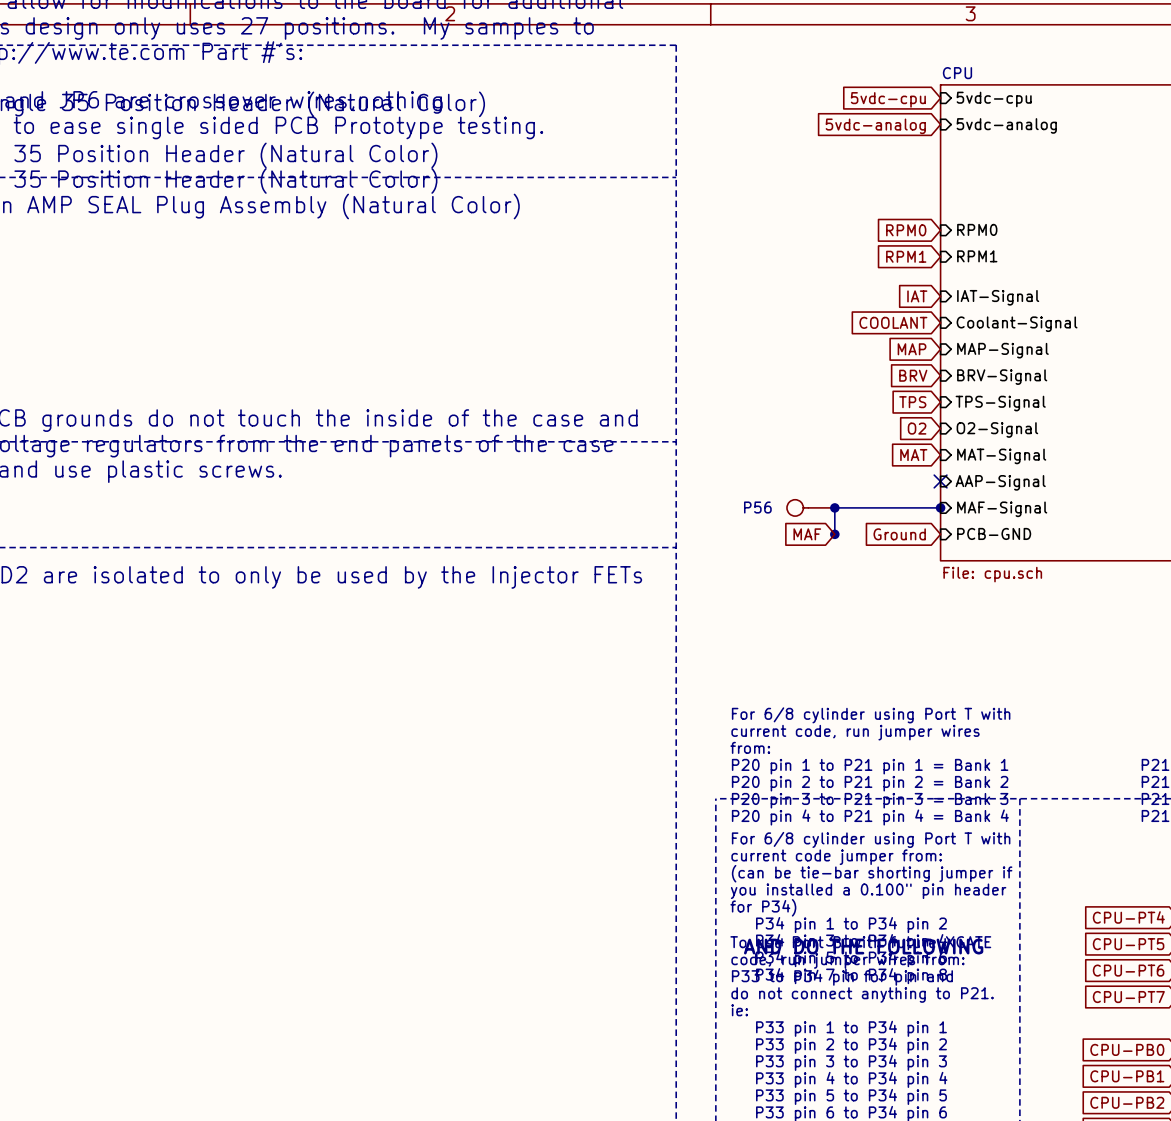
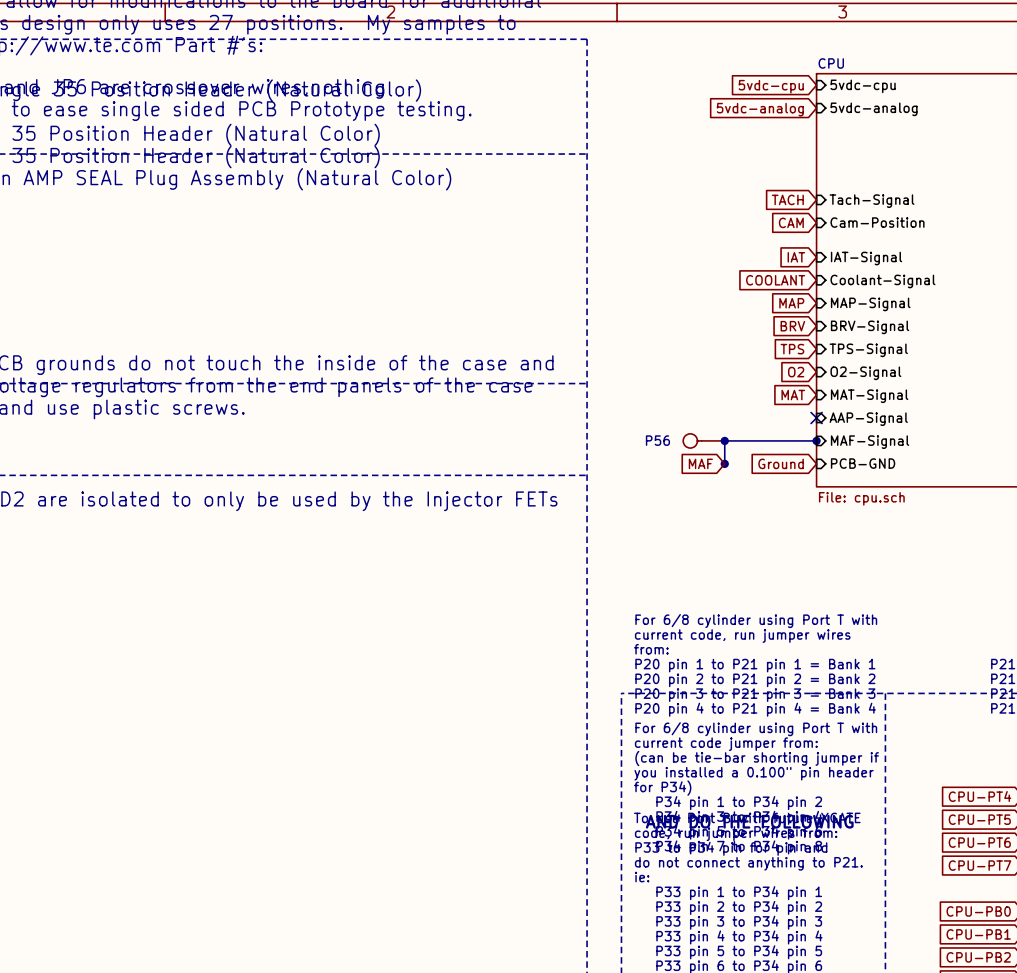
sheet pin: RPM0 (977, 229) -> Tach-Signal (872, 201)
global label: RPM0 (906, 230) -> TACH (787, 199)
global label: RPM1 (906, 256) -> CAM (791, 222)
sheet pin: RPM1 (977, 256) -> Cam-Position (877, 222)

